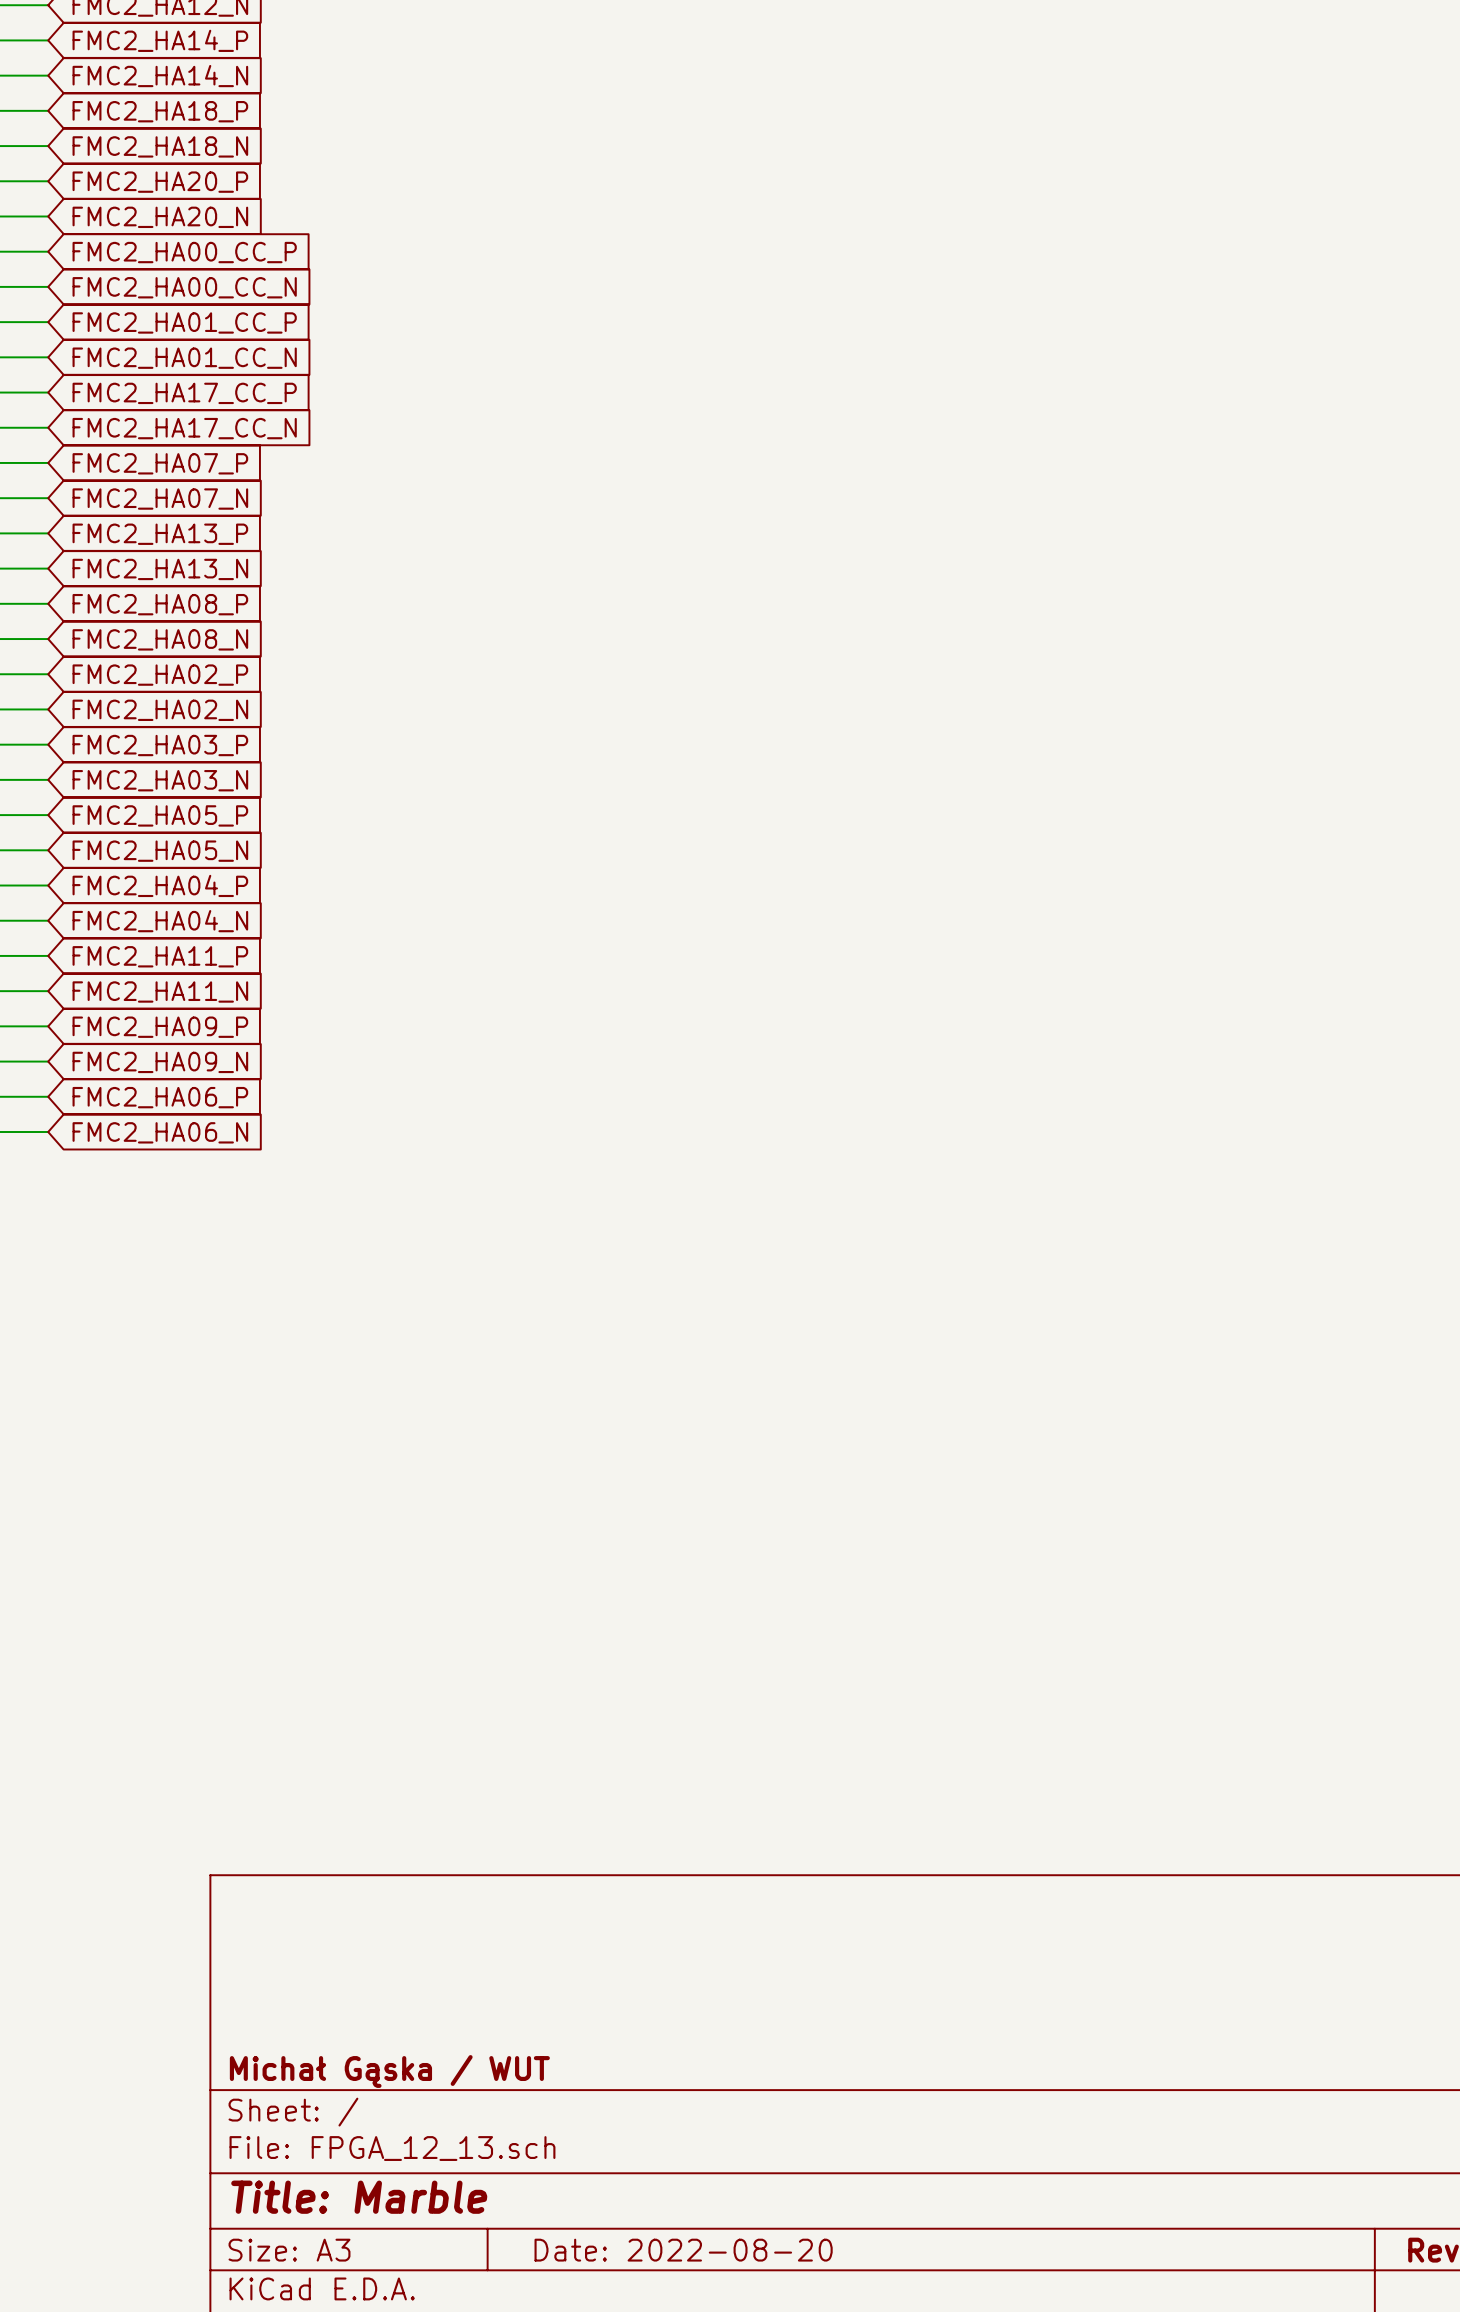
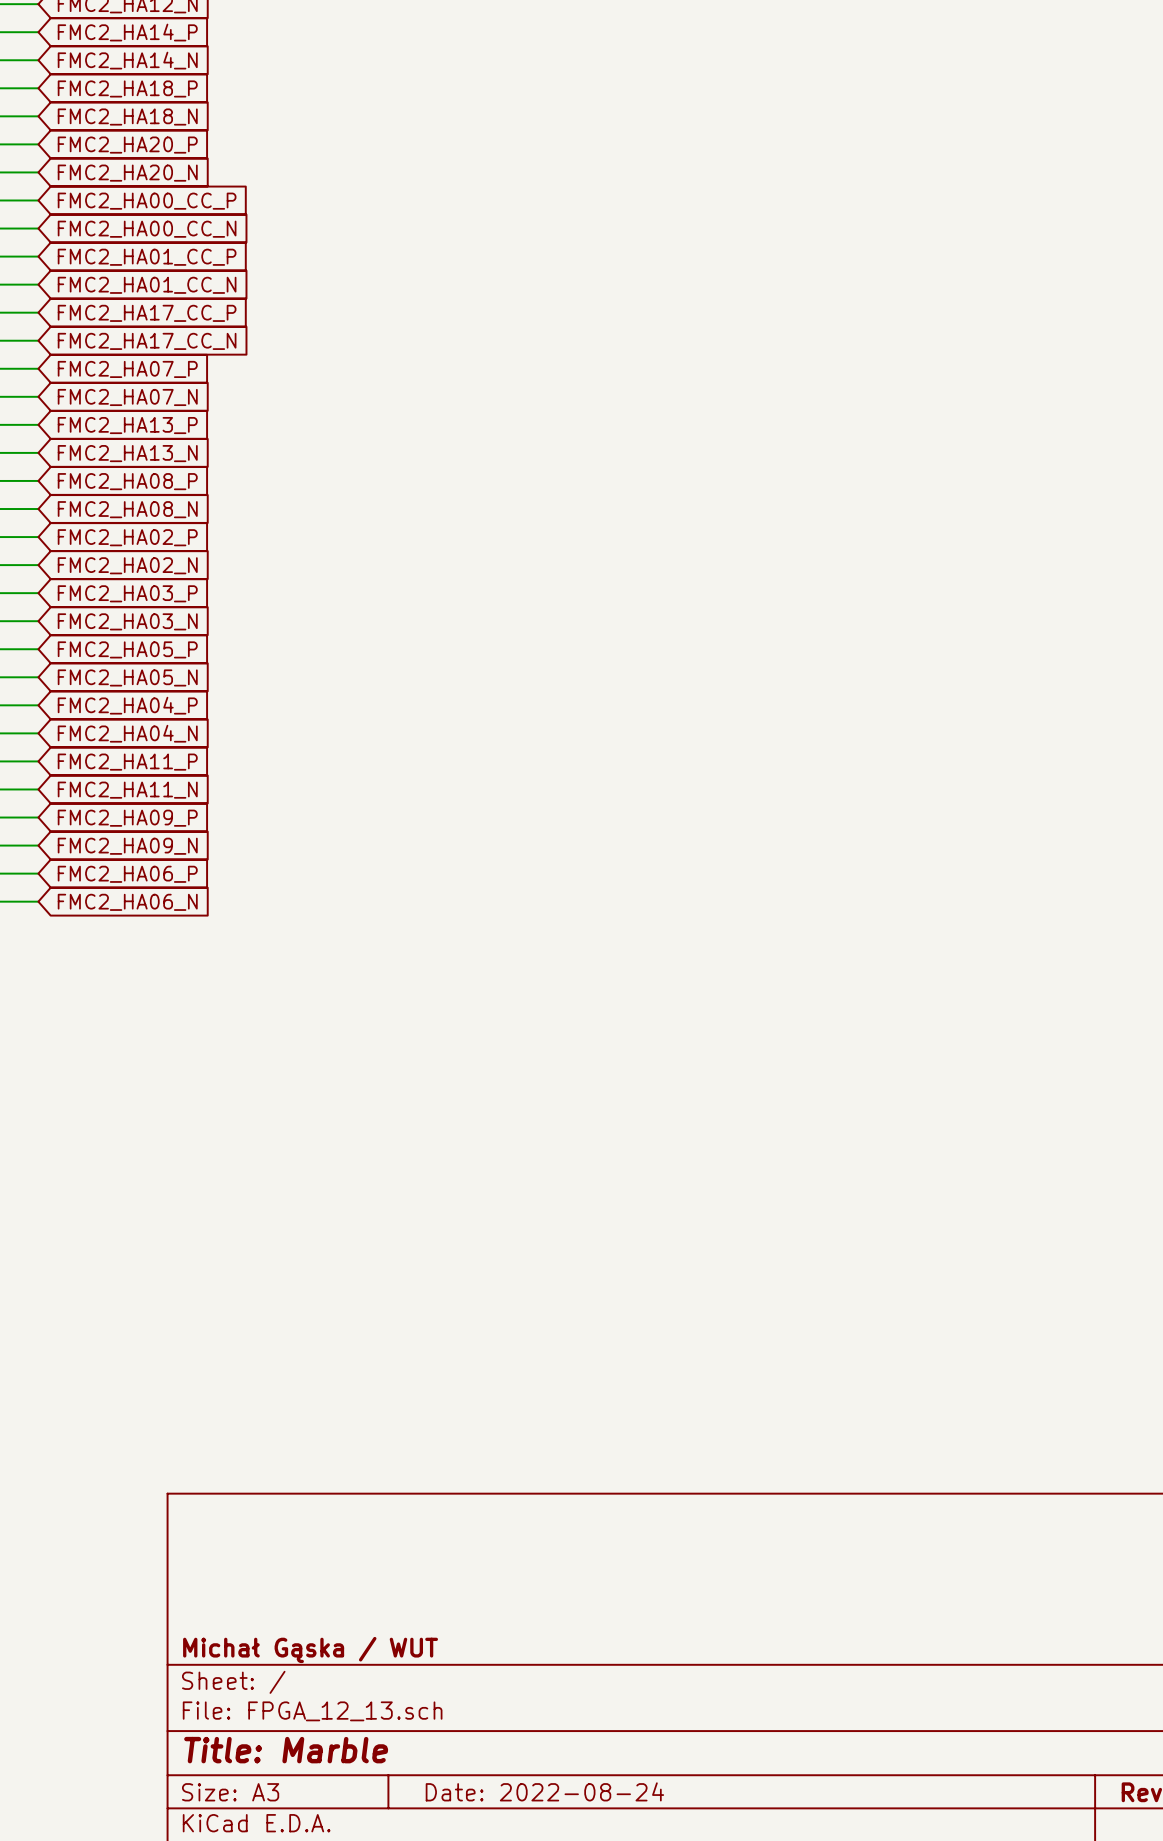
title block: Date: 2022-08-20 (683, 2250) -> Date: 2022-08-24 (544, 1791)

